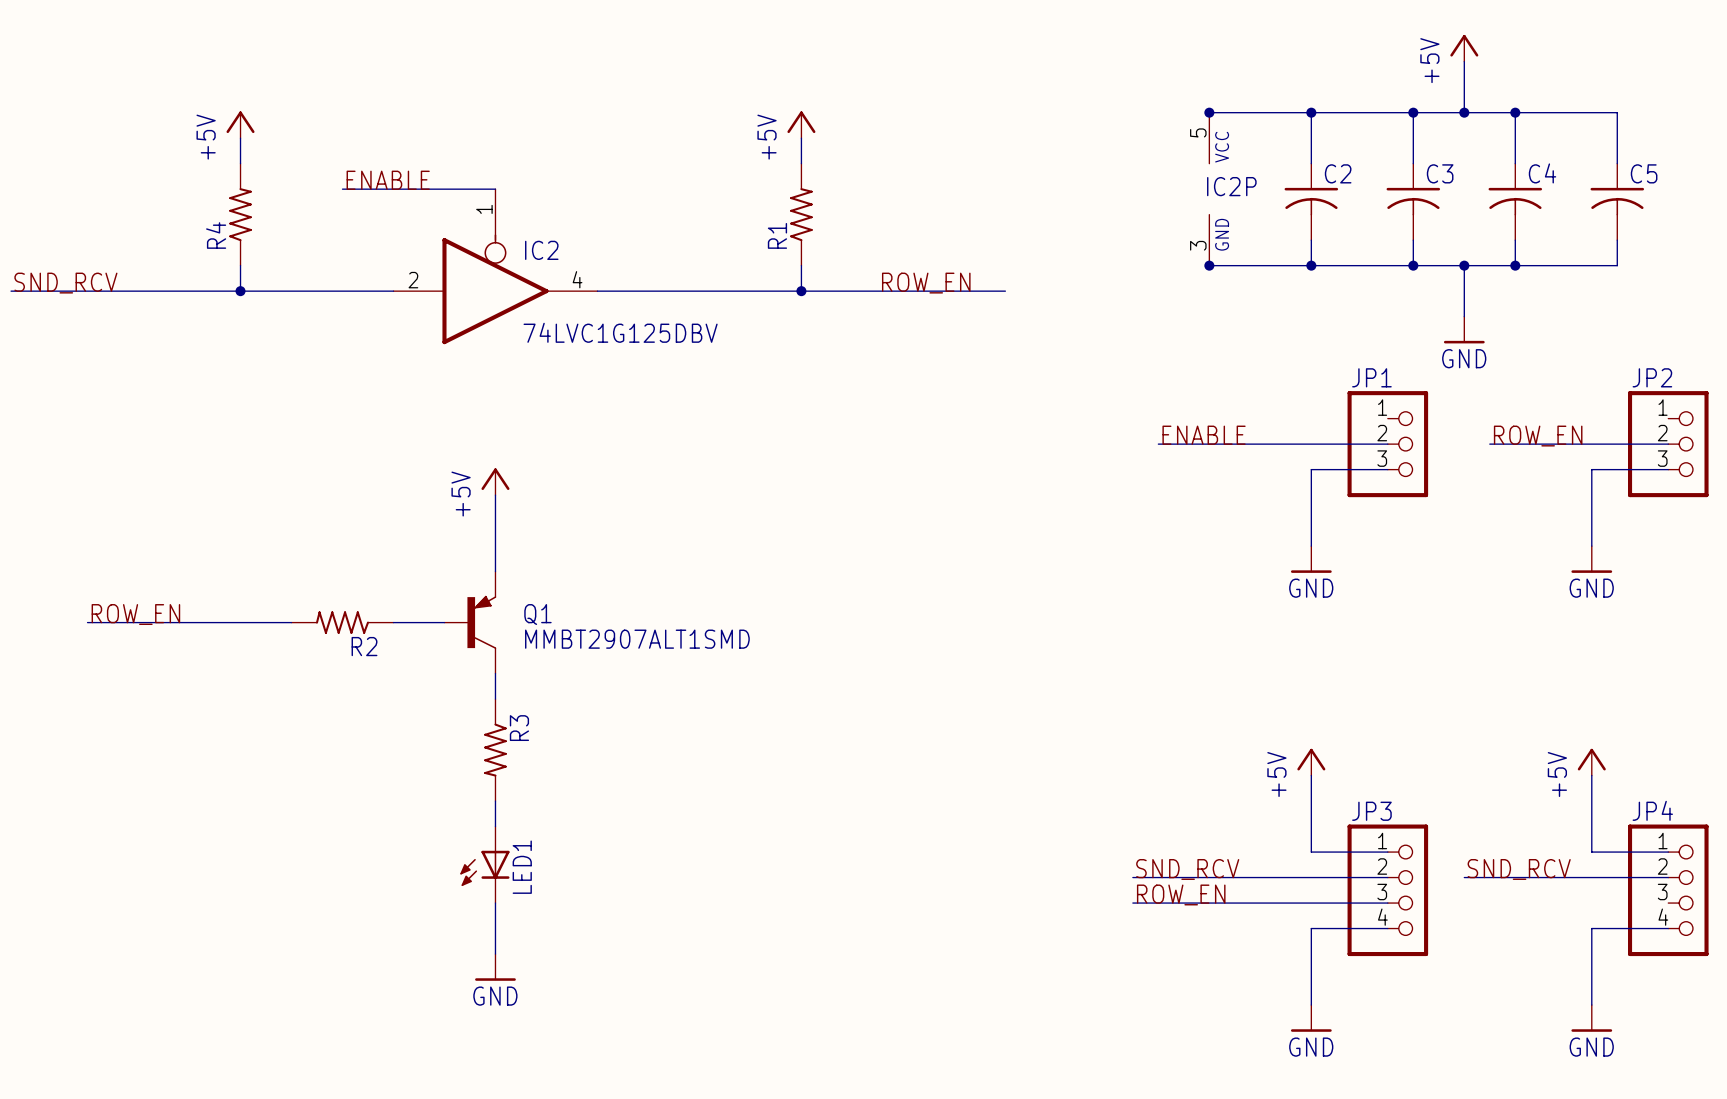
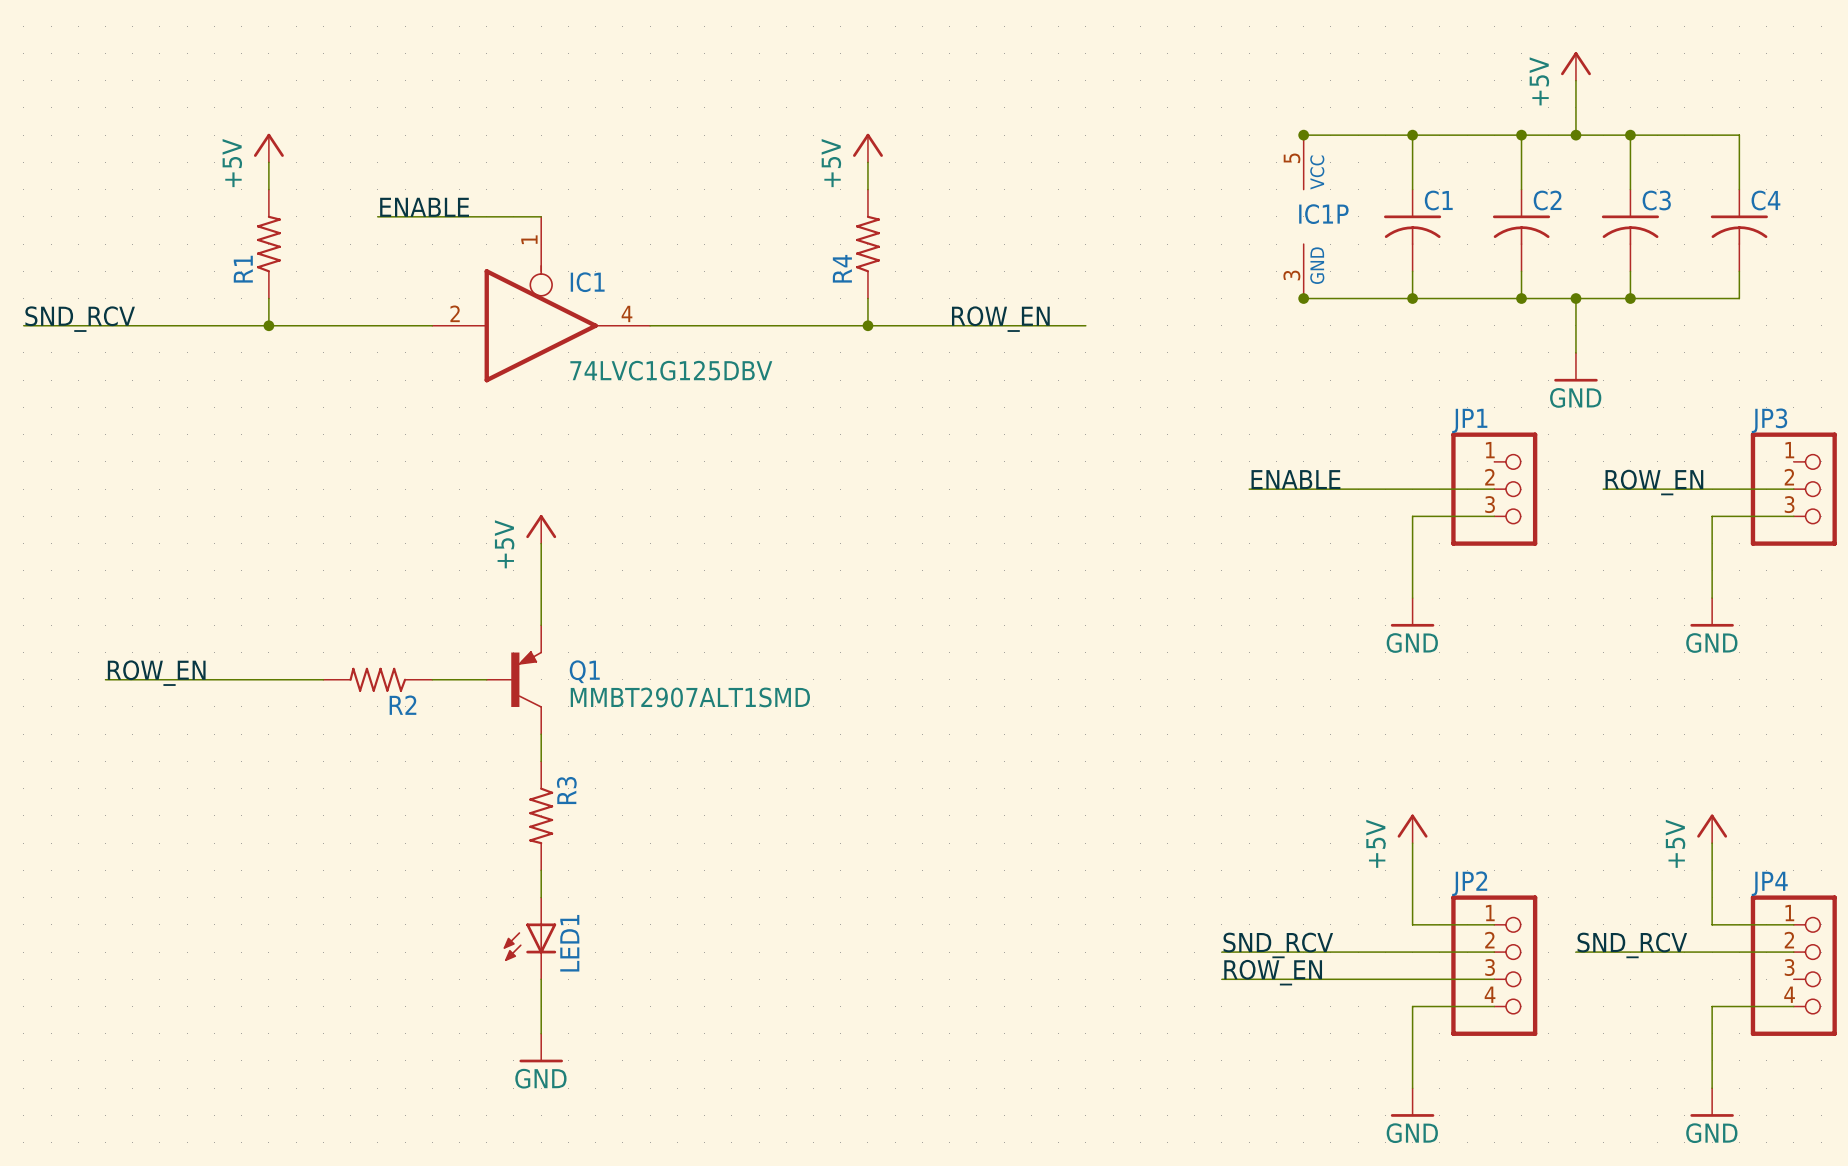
C2 name: C2 (1338, 173) -> C1 (1438, 200)
C3 name: C3 (1440, 173) -> C2 (1547, 200)
C4 name: C4 (1542, 173) -> C3 (1656, 200)
C5 name: C5 (1644, 173) -> C4 (1765, 200)
IC2P name: IC2P (1231, 186) -> IC1P (1323, 214)
R4 name: R4 (216, 235) -> R1 (243, 269)
R1 name: R1 (777, 235) -> R4 (842, 268)
IC2 name: IC2 (541, 250) -> IC1 (587, 282)
JP2 name: JP2 (1652, 377) -> JP3 (1769, 420)
JP3 name: JP3 (1371, 811) -> JP2 (1469, 883)

